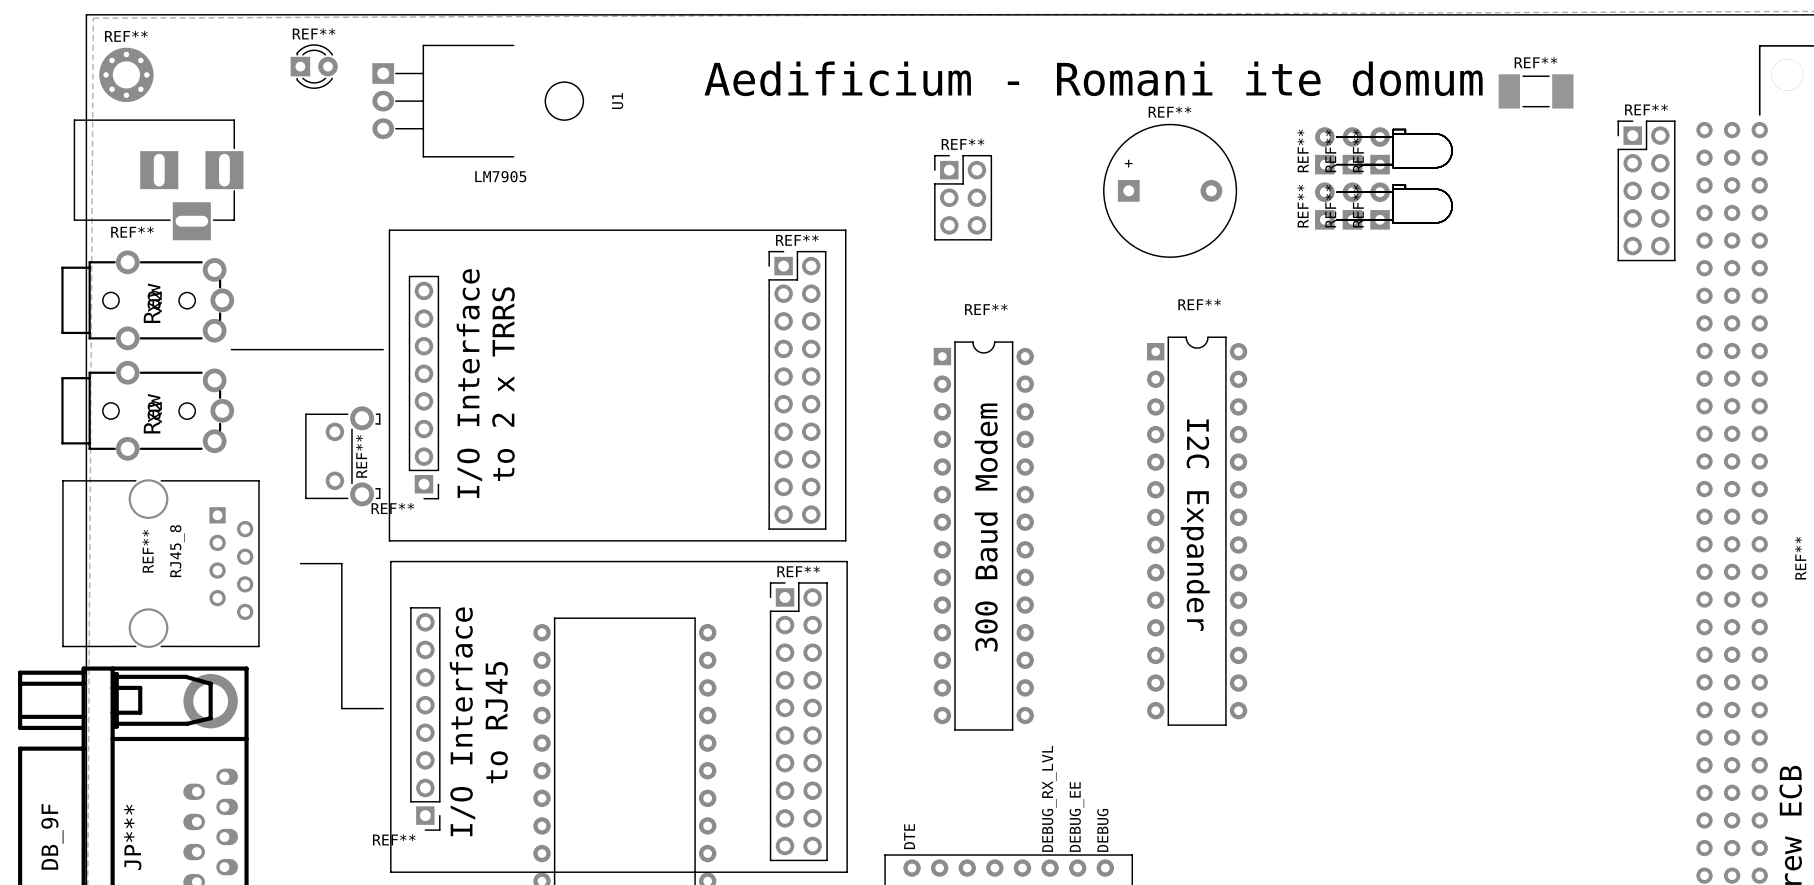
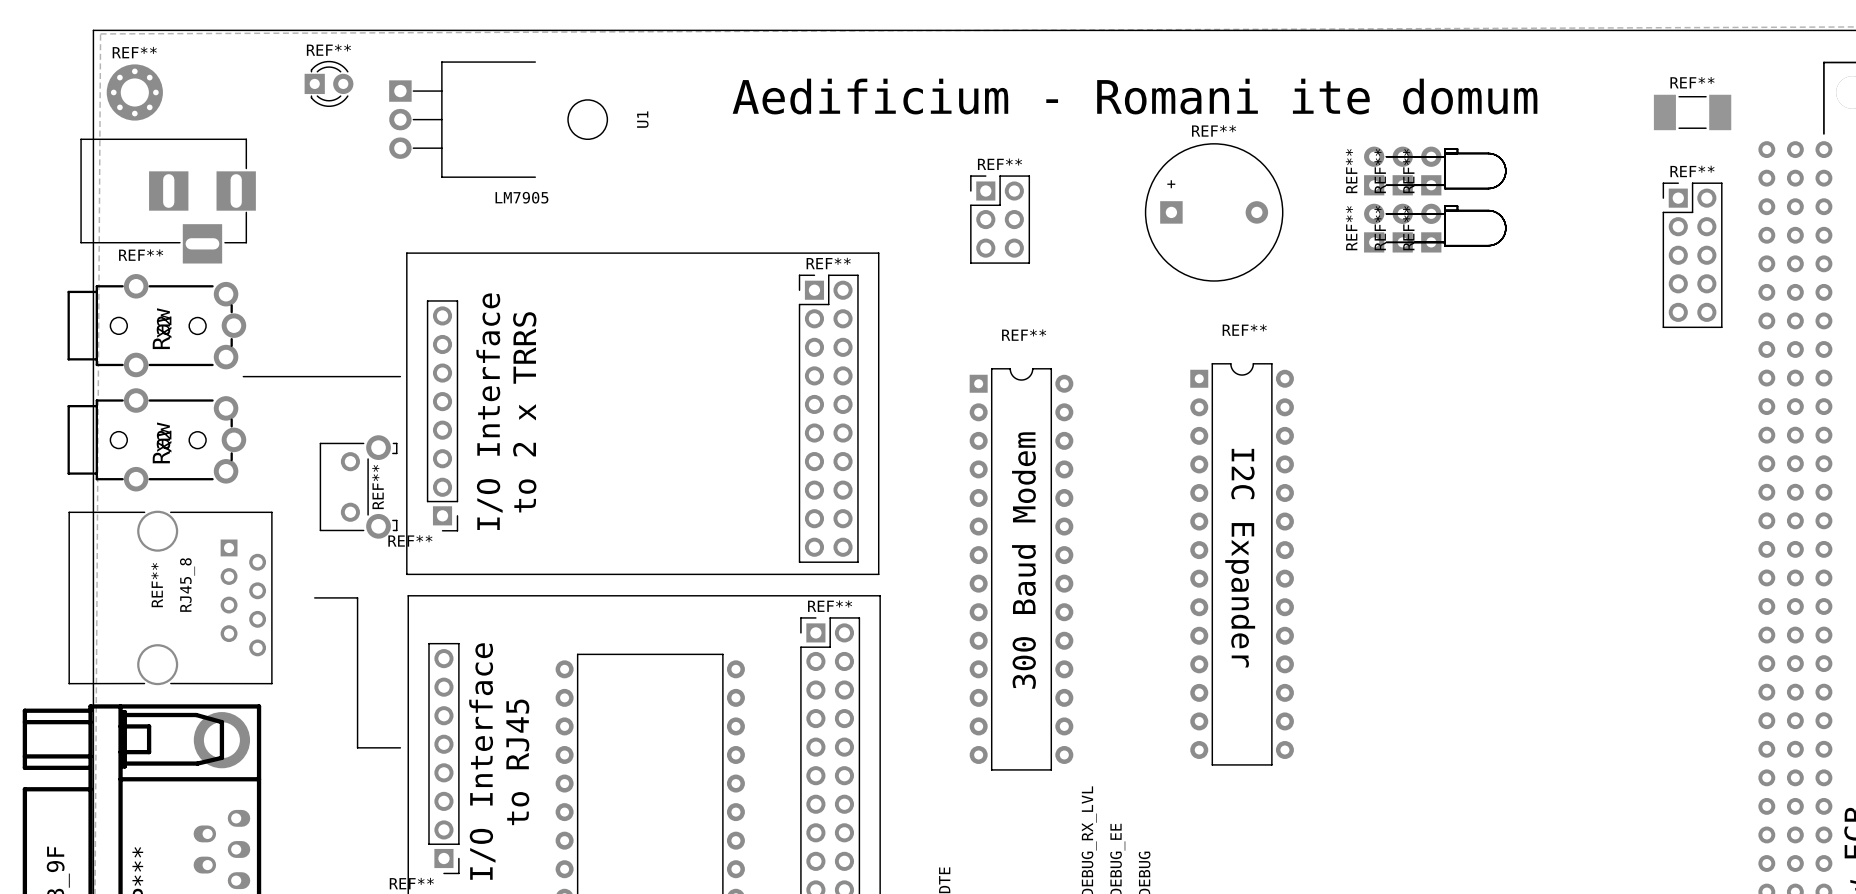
REF** position: (1536, 91) -> (1692, 112)
REF** position: (1646, 190) -> (1692, 255)

